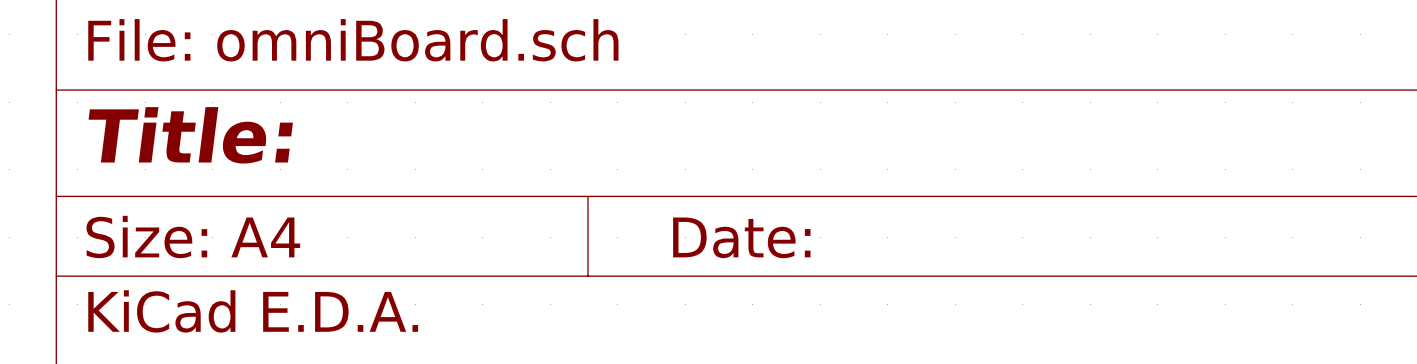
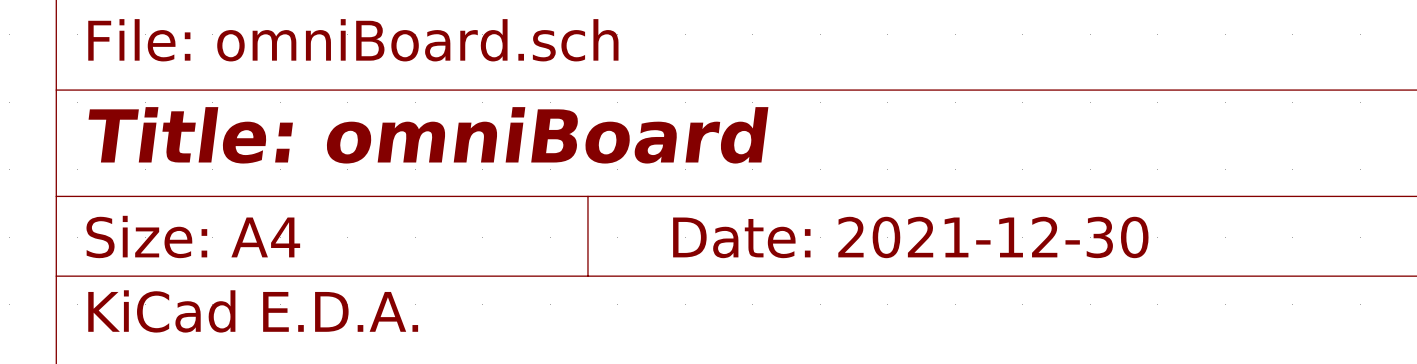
title block: Title: (190, 135) -> Title: omniBoard (428, 135)
title block: Date: (741, 237) -> Date: 2021-12-30 (910, 237)

